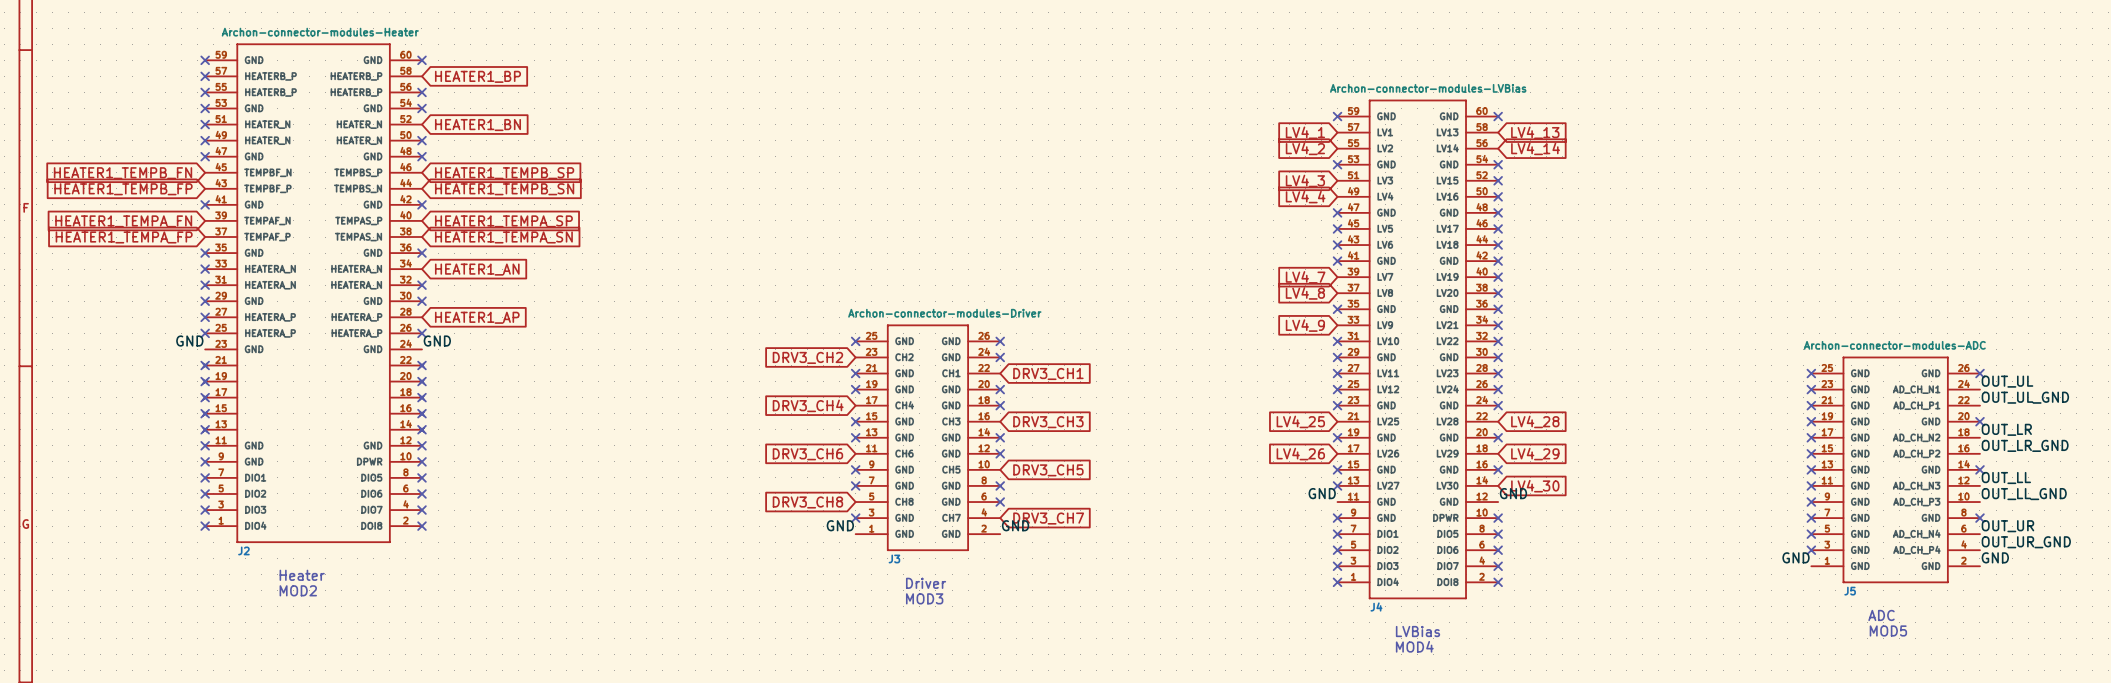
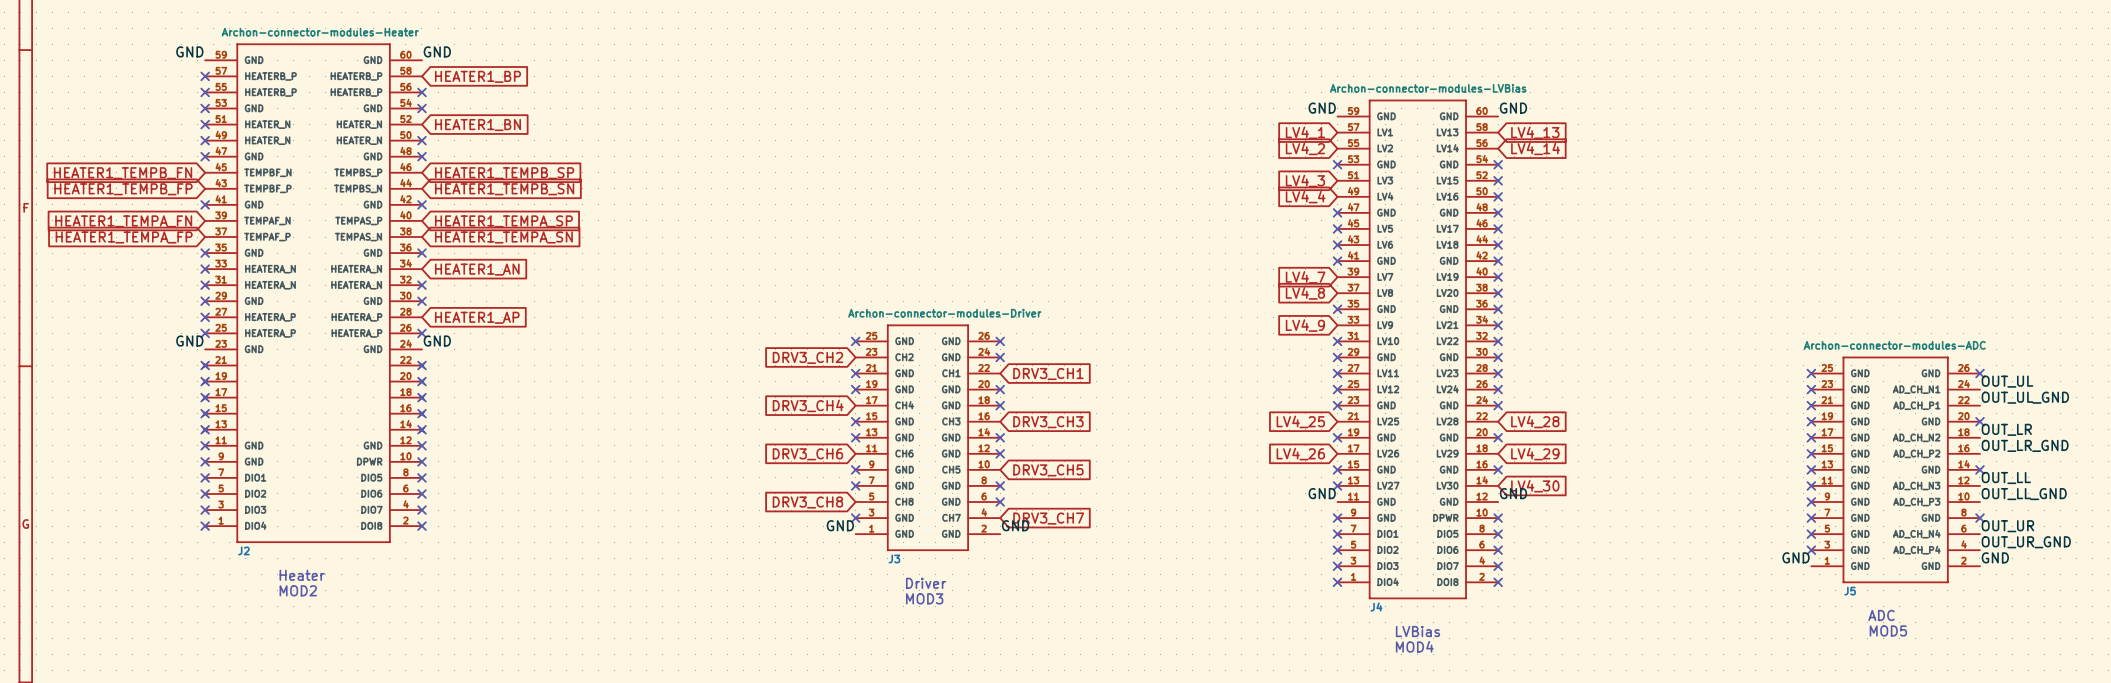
label: none -> GND (189, 51)
label: none -> GND (437, 51)
no-connect mark: (205, 60) -> none
no-connect mark: (421, 60) -> none
label: none -> GND (1322, 108)
label: none -> GND (1513, 108)
no-connect mark: (1337, 116) -> none
no-connect mark: (1498, 116) -> none

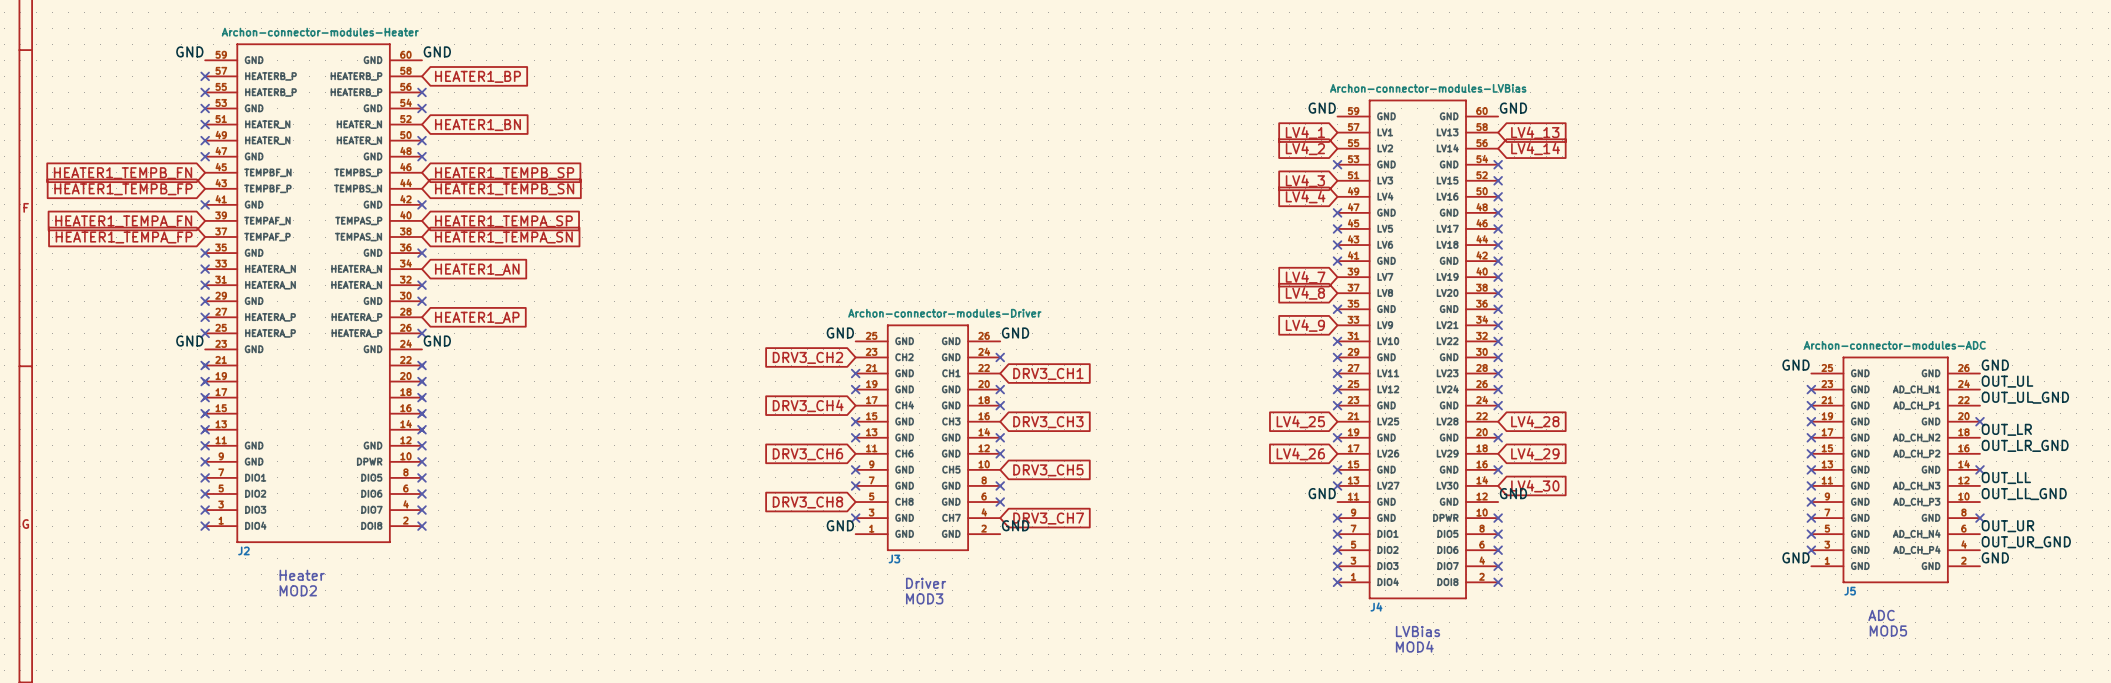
label: none -> GND (840, 332)
label: none -> GND (1015, 332)
no-connect mark: (855, 341) -> none
no-connect mark: (1000, 341) -> none
label: none -> GND (1796, 365)
label: none -> GND (1995, 365)
no-connect mark: (1811, 373) -> none
no-connect mark: (1979, 373) -> none

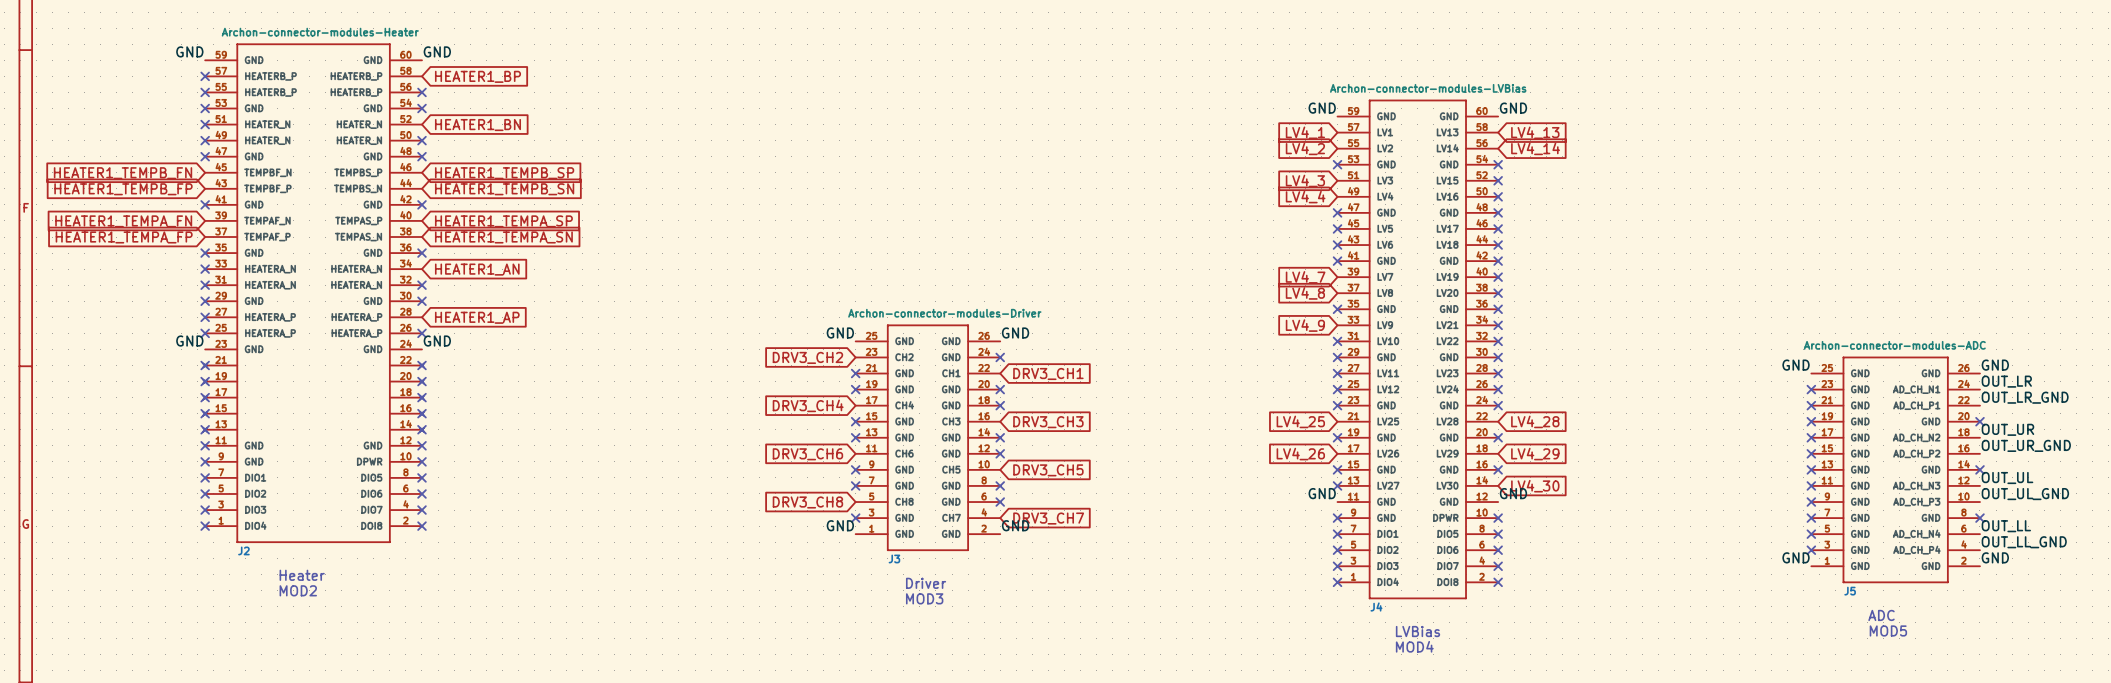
label: OUT_UL (2007, 381) -> OUT_LR (2006, 381)
label: OUT_UL_GND (2025, 397) -> OUT_LR_GND (2025, 397)
label: OUT_LR (2006, 429) -> OUT_UR (2007, 429)
label: OUT_LR_GND (2025, 445) -> OUT_UR_GND (2026, 445)
label: OUT_LL (2006, 478) -> OUT_UL (2007, 478)
label: OUT_LL_GND (2024, 494) -> OUT_UL_GND (2025, 494)
label: OUT_UR (2007, 526) -> OUT_LL (2006, 526)
label: OUT_UR_GND (2026, 542) -> OUT_LL_GND (2024, 542)

